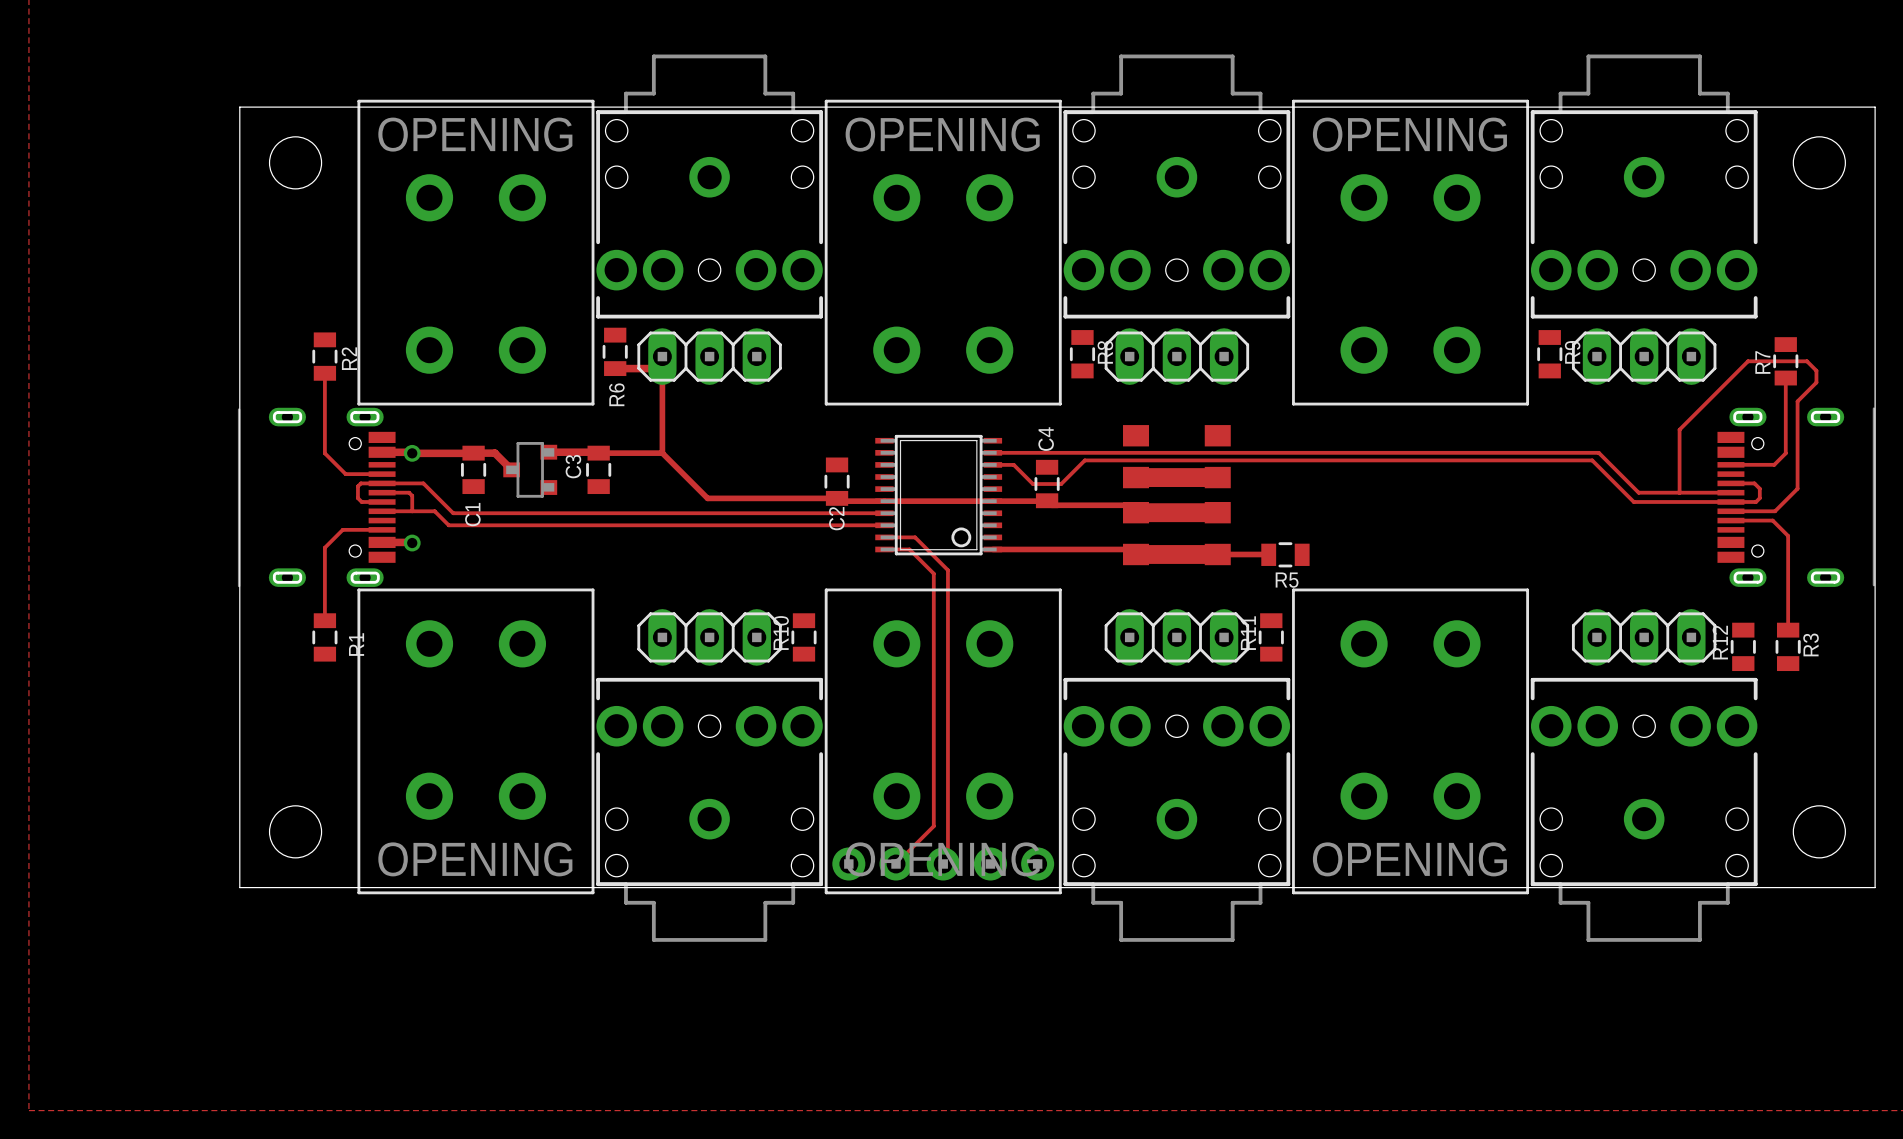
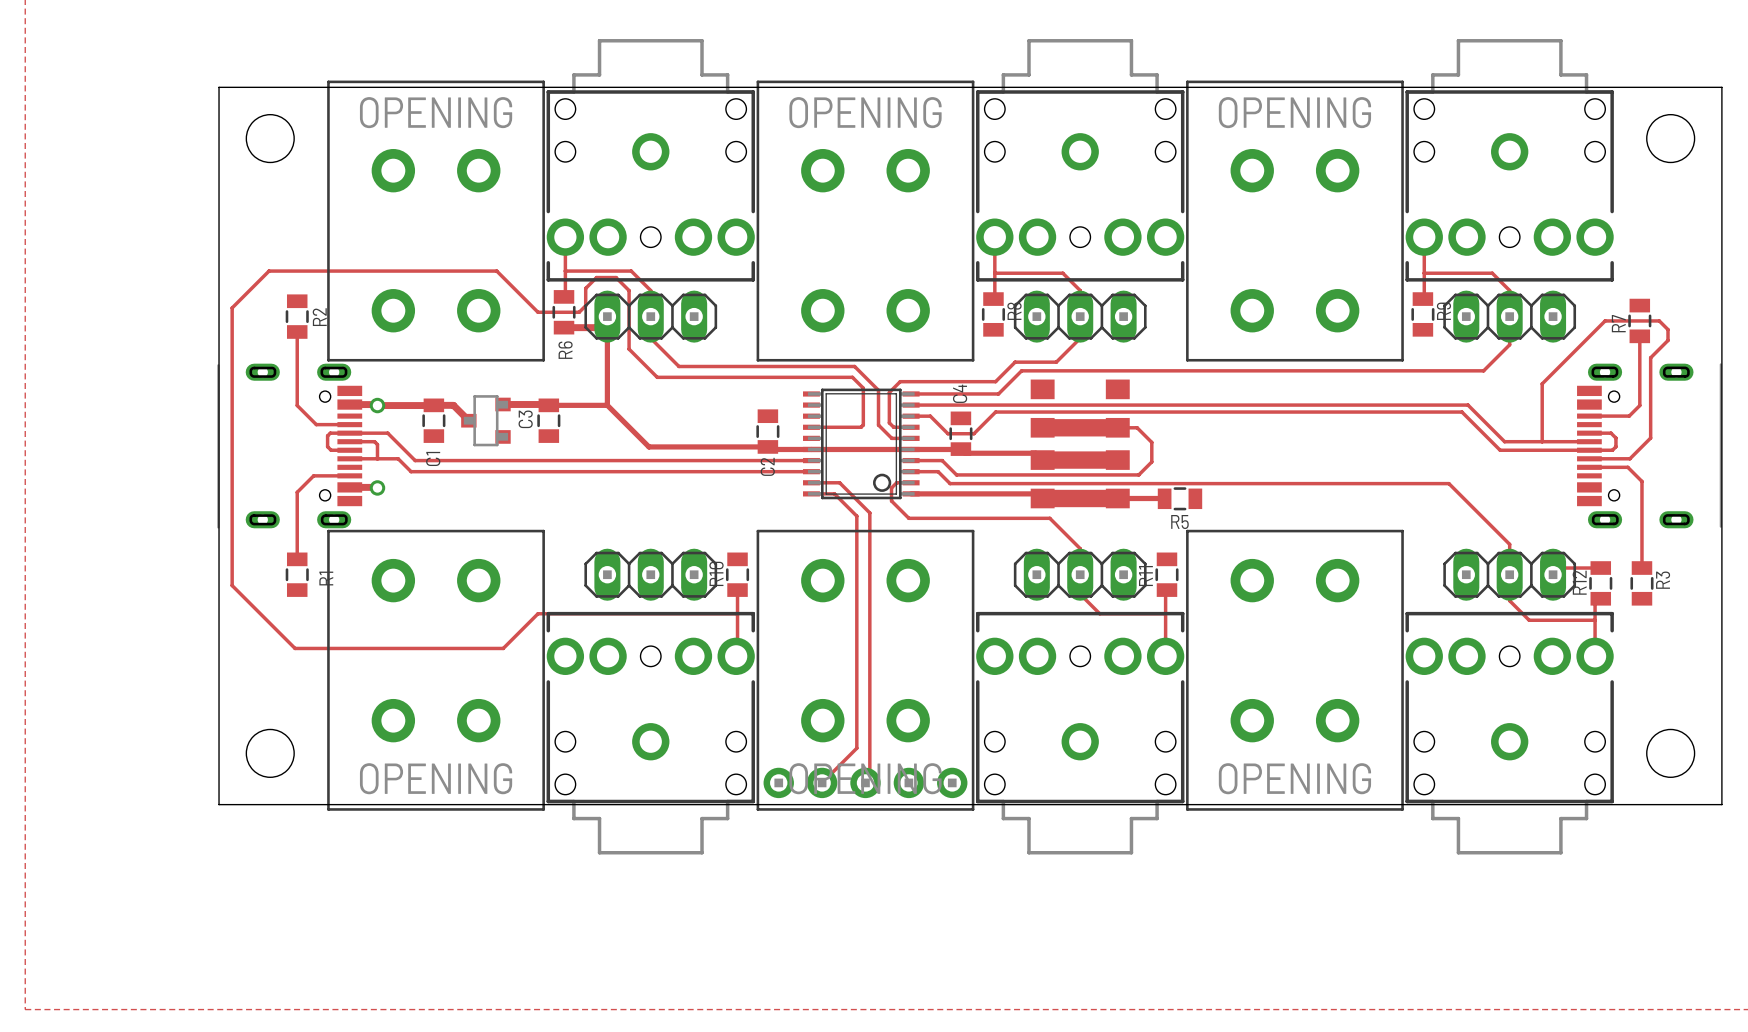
track: none -> (565, 237) (564, 296)
track: none -> (994, 237) (993, 299)
track: none -> (1424, 237) (1422, 299)
track: none -> (565, 271) (631, 271) (650, 290) (650, 338) (678, 366) (854, 366) (878, 390) (878, 425) (891, 438) (911, 438)
track: none -> (994, 273) (1062, 273) (1080, 290) (1080, 338) (1056, 362) (1015, 362) (995, 381) (900, 381) (889, 392) (889, 422) (893, 427) (911, 427)
track: none -> (1424, 273) (1492, 273) (1509, 290) (1509, 344) (1483, 370) (1021, 370) (998, 393) (911, 393)
track: none -> (811, 427) (861, 427) (863, 425) (863, 388) (852, 377) (657, 377) (629, 349) (629, 290) (616, 277) (596, 277) (585, 288) (585, 305) (579, 312) (537, 312) (496, 271) (269, 271) (232, 307) (232, 585) (295, 648) (503, 648) (537, 613) (737, 613)
track: none -> (1117, 427) (1137, 427) (1151, 442) (1151, 461) (1138, 474) (956, 474) (942, 460) (911, 460)
track: none -> (911, 471) (938, 471) (950, 483) (1448, 483) (1509, 544) (1509, 600) (1529, 620) (1595, 620)
track: none -> (911, 482) (896, 482) (891, 487) (891, 500) (908, 518) (1049, 518) (1080, 548) (1080, 594) (1099, 613) (1165, 613)
track: none -> (1600, 568) (1559, 568) (1553, 574)
track: none -> (737, 590) (736, 656)
track: none -> (1166, 590) (1165, 656)
track: none -> (1600, 598) (1595, 604) (1595, 656)

